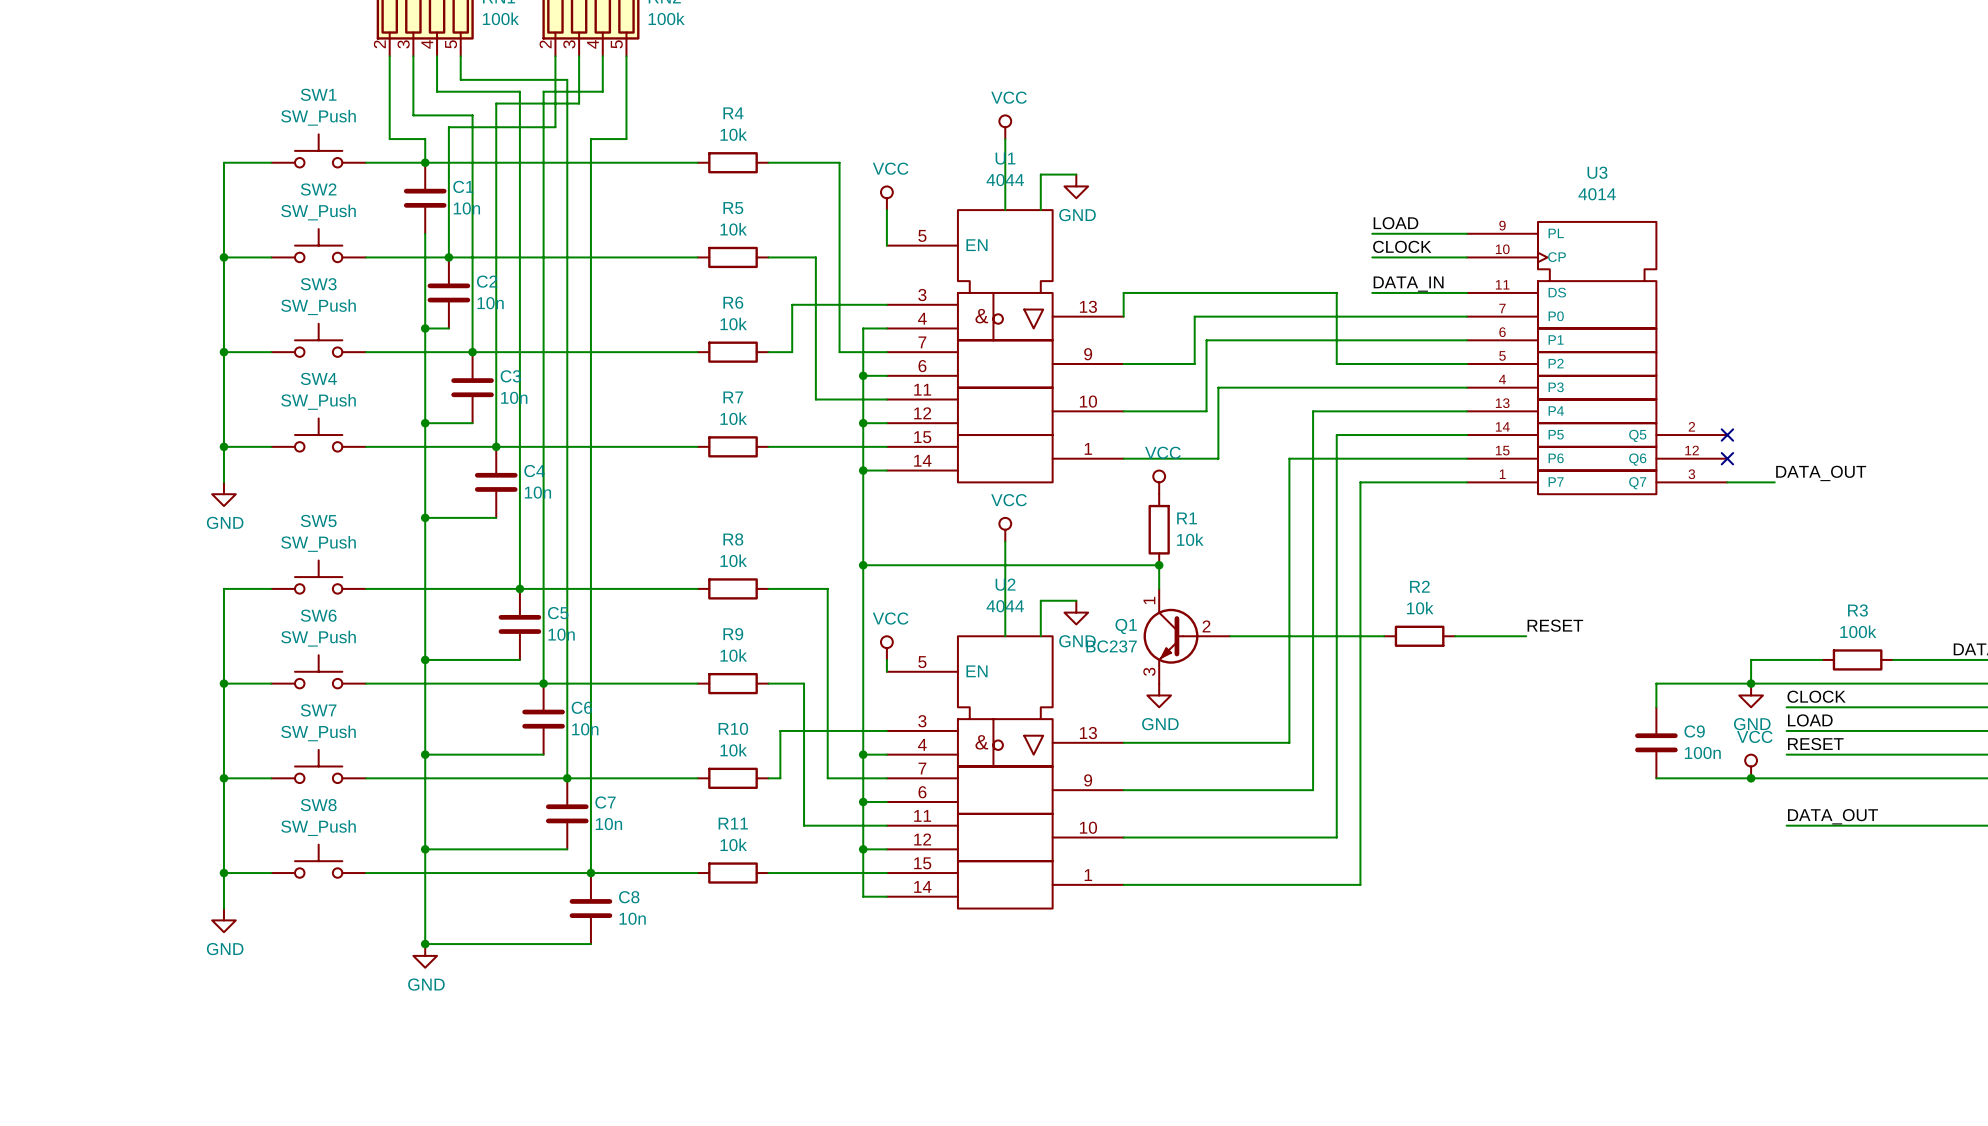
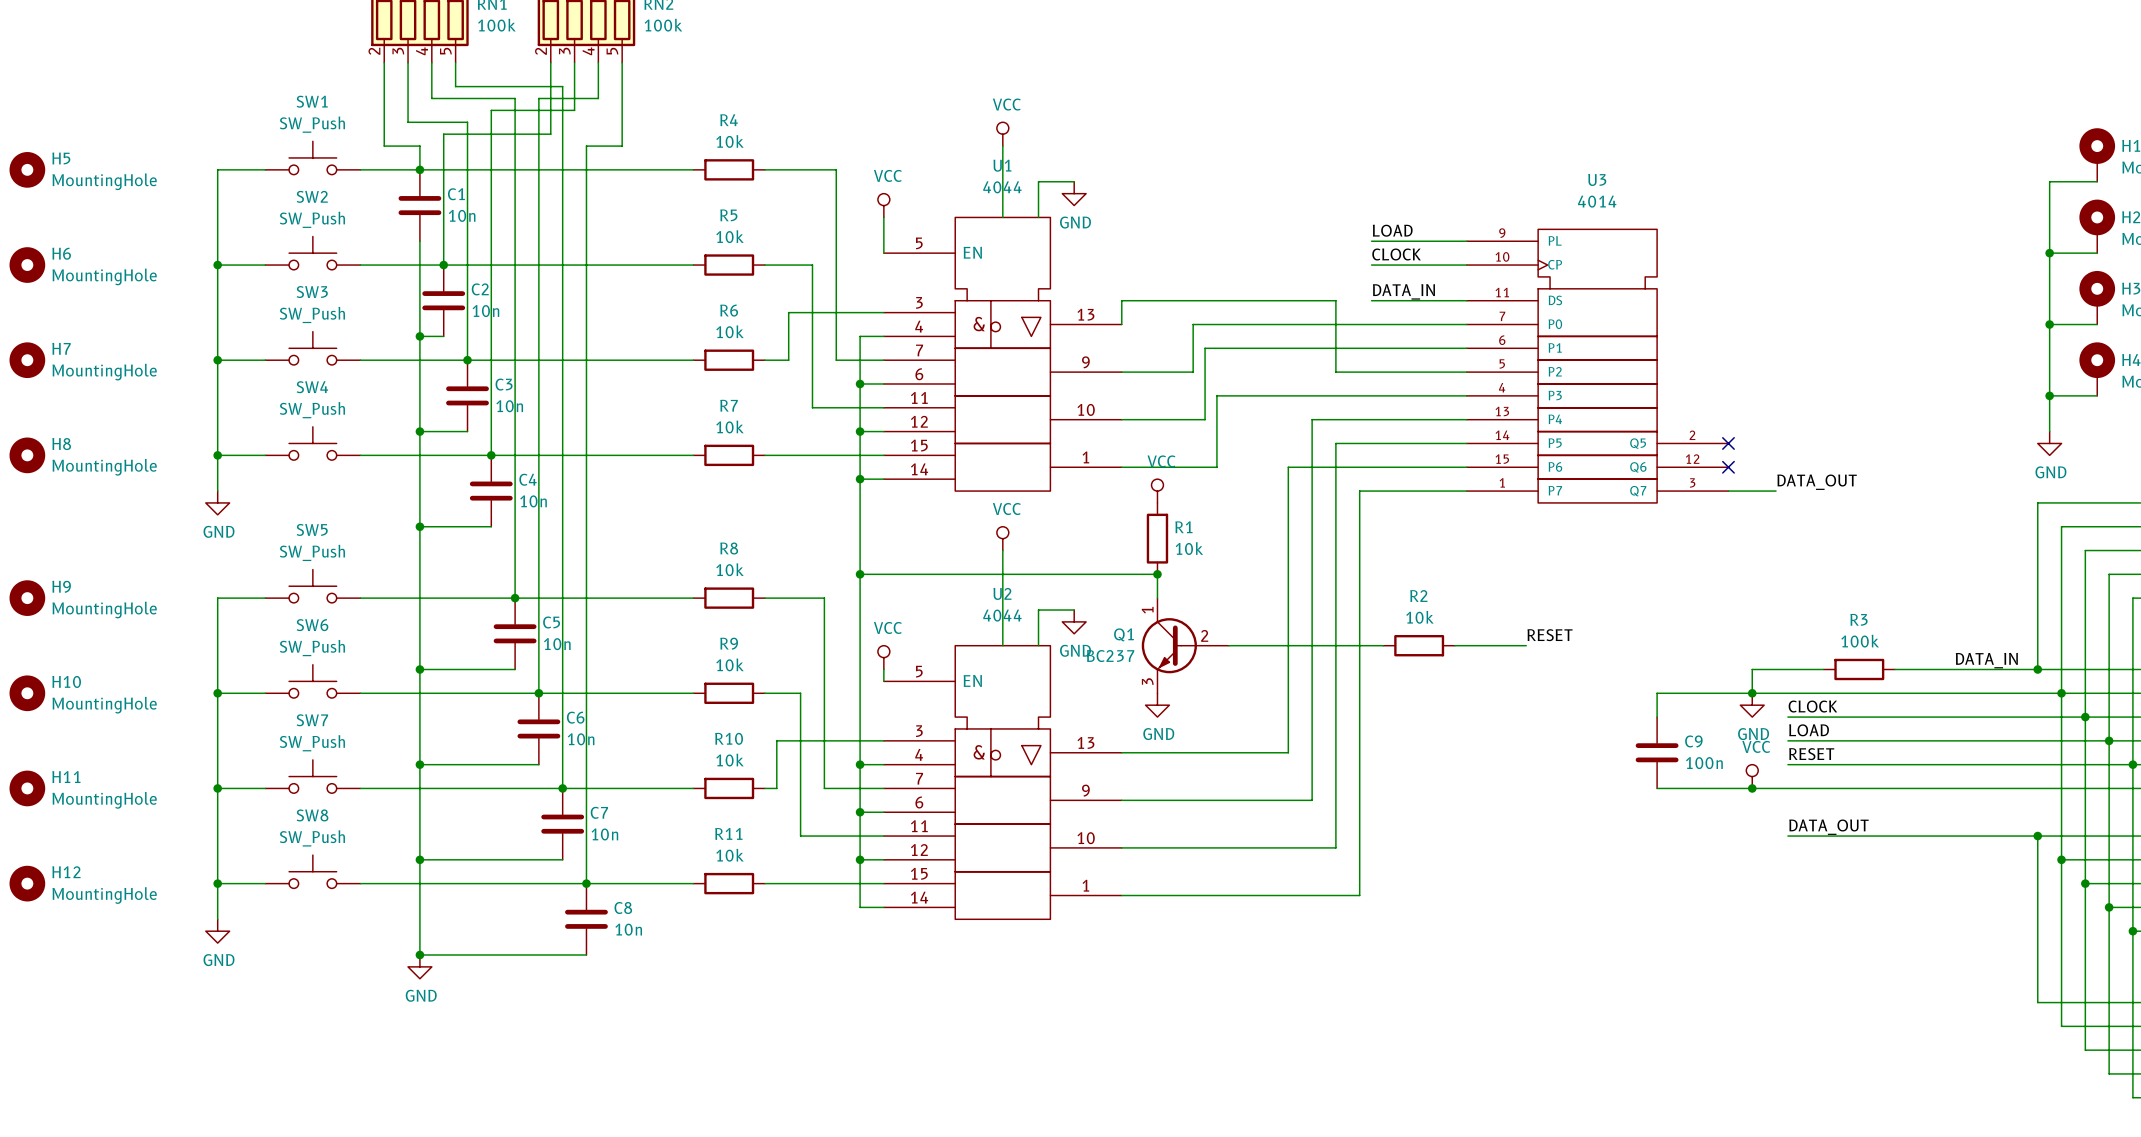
H5: none -> MountingHole (27, 169)
H6: none -> MountingHole (27, 265)
H7: none -> MountingHole (27, 360)
H8: none -> MountingHole (27, 455)
H9: none -> MountingHole (27, 598)
H10: none -> MountingHole (27, 693)
H11: none -> MountingHole (27, 788)
H12: none -> MountingHole (27, 883)

